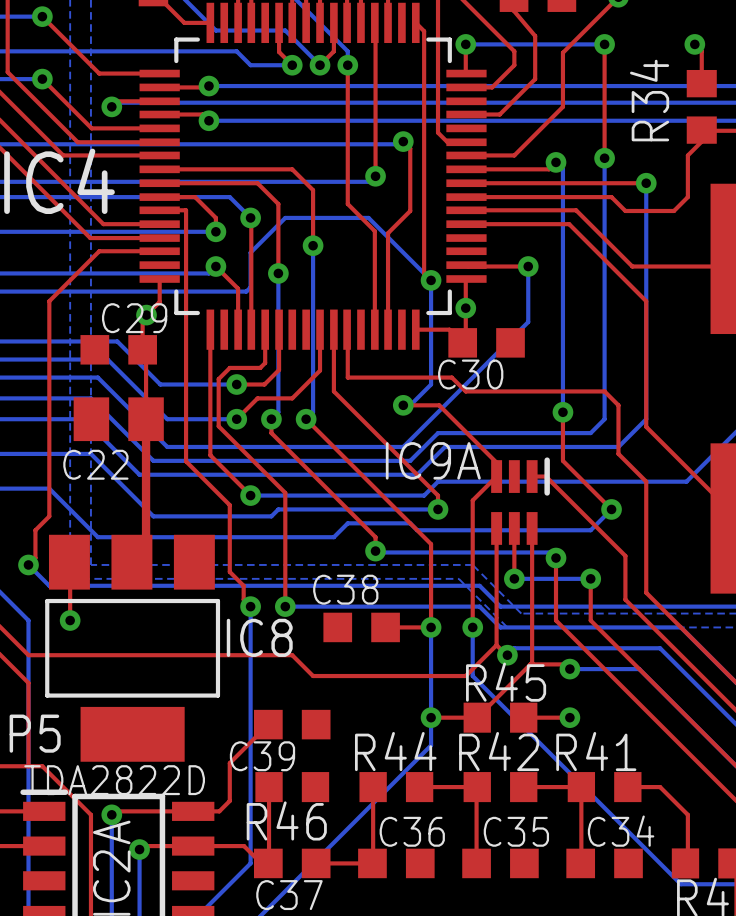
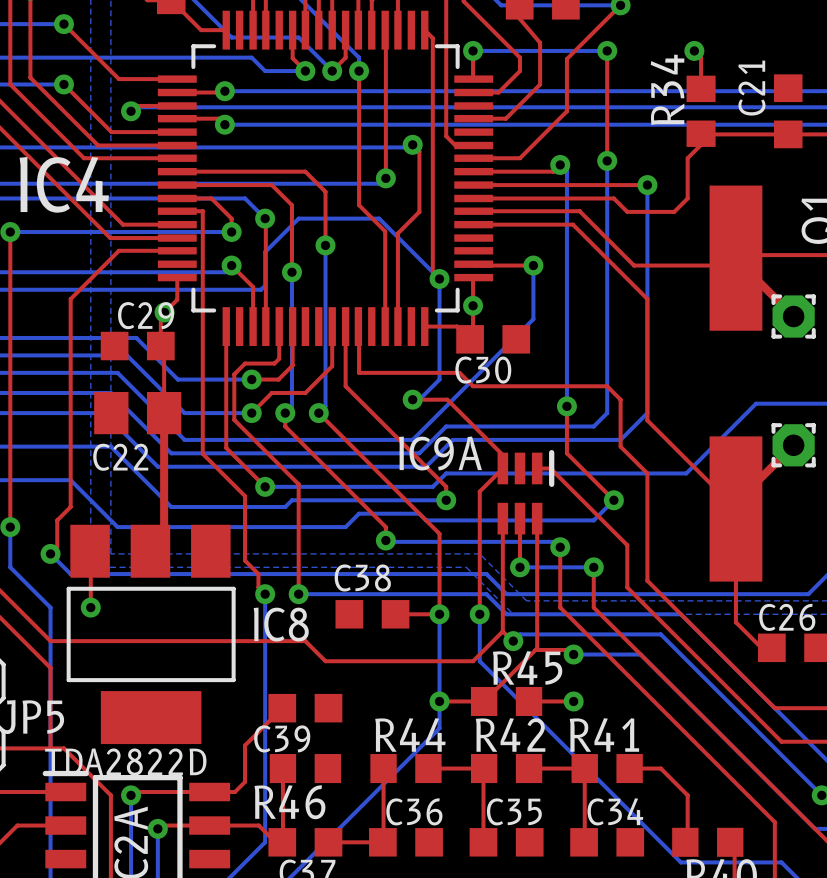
R34 name position: R34 (649, 100) -> R34 (667, 89)
R45 name position: R45 (506, 682) -> R45 (527, 667)
R46 name position: R46 (286, 820) -> R46 (289, 802)

